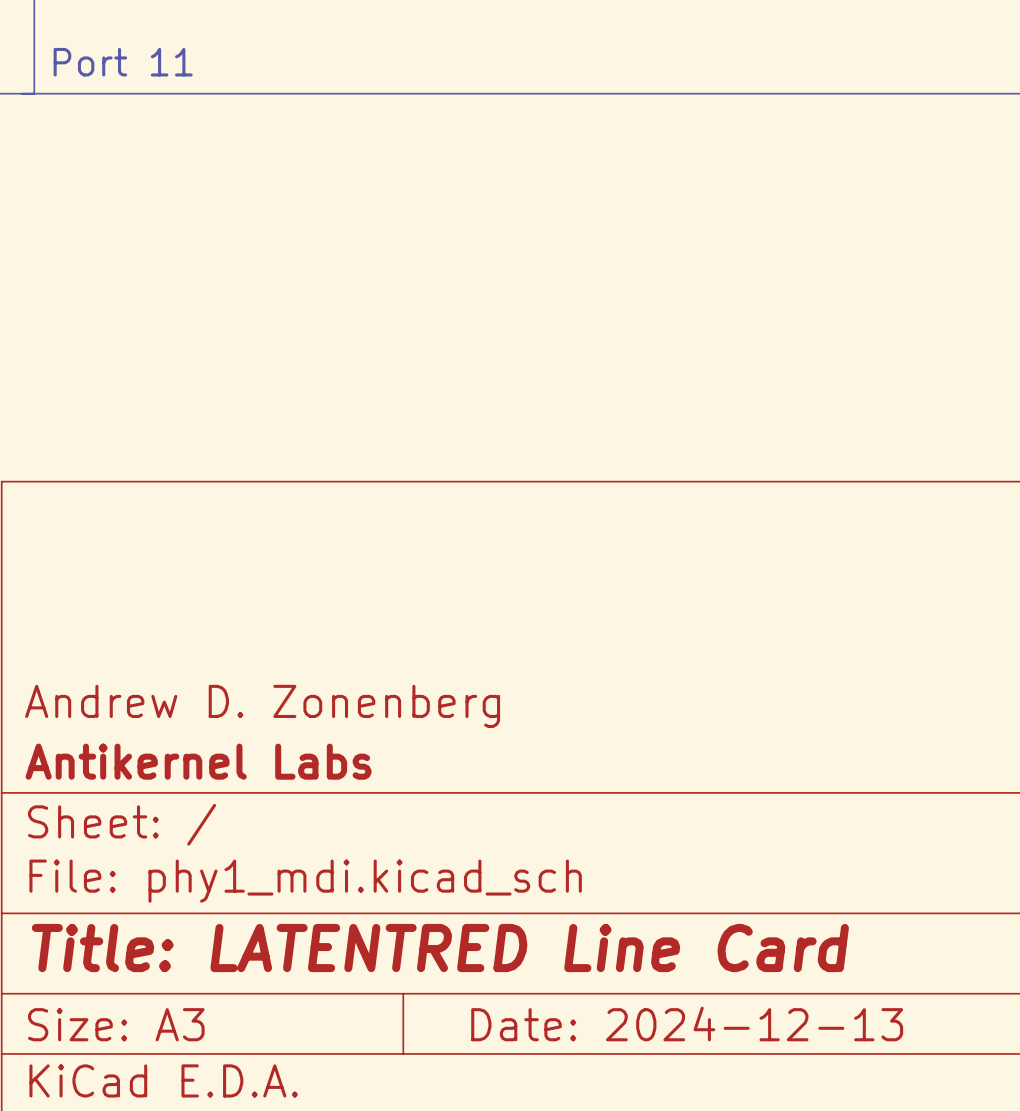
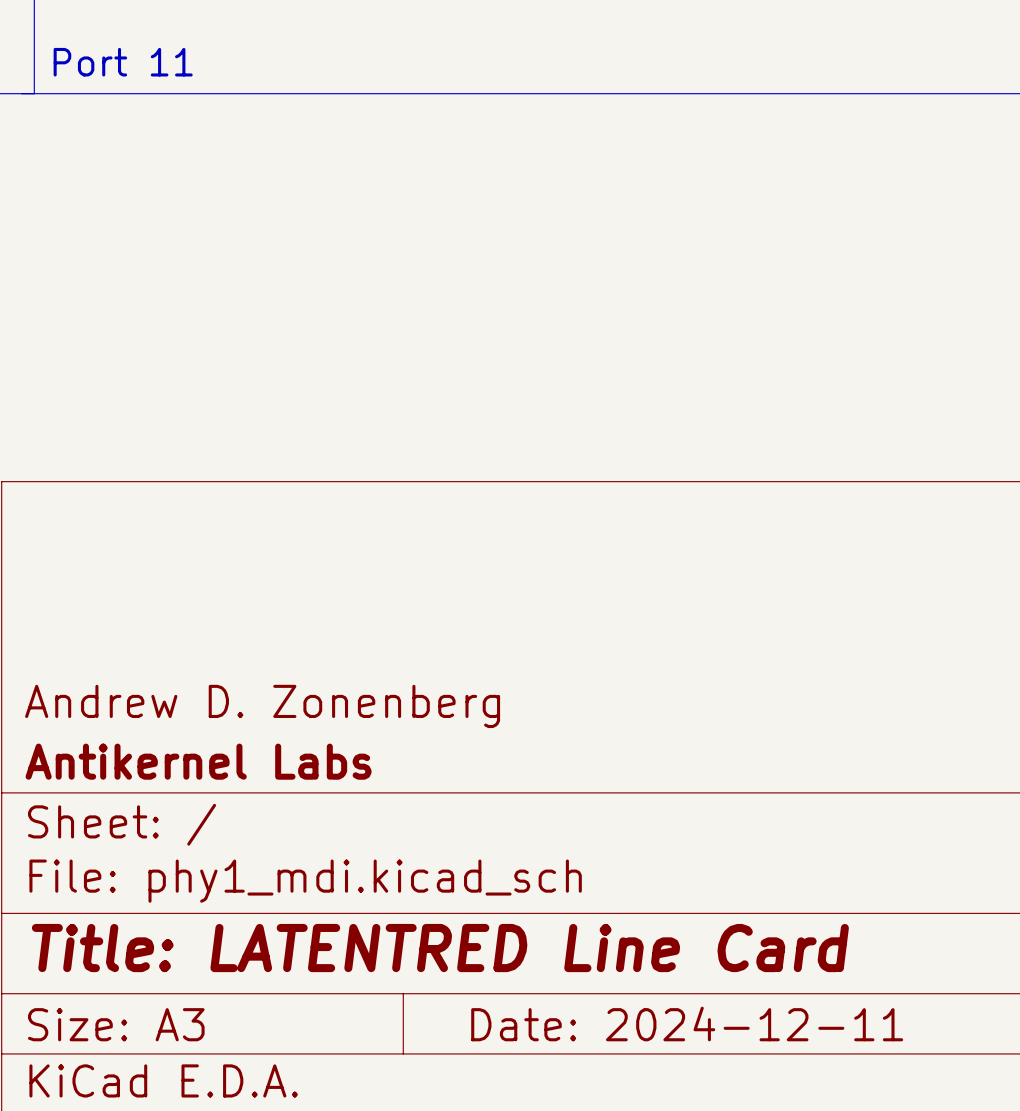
title block: Date: 2024-12-13 (687, 1024) -> Date: 2024-12-11 (687, 1024)

